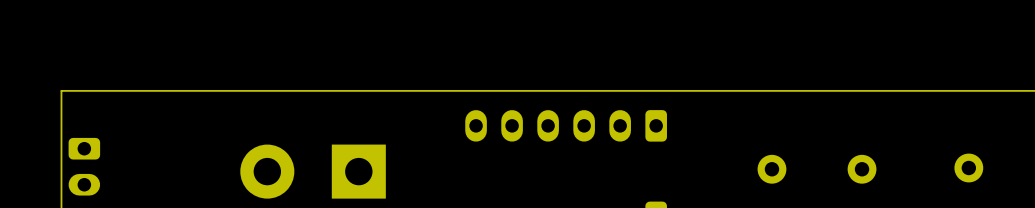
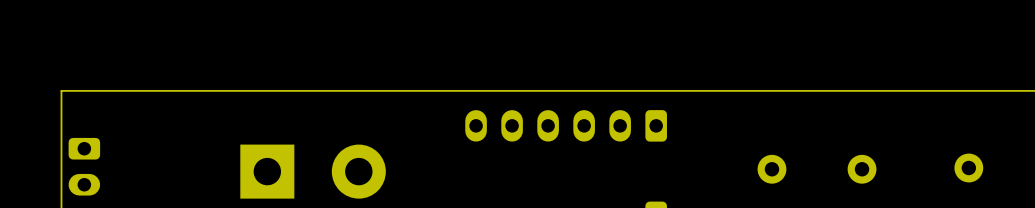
part rotation: 0° (313, 171) -> 180° (313, 171)

